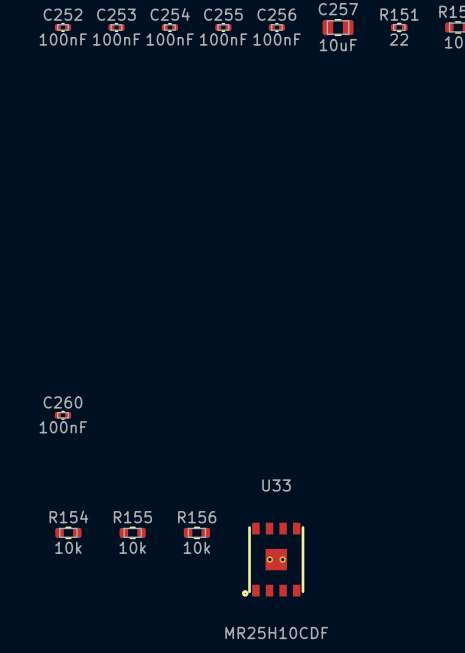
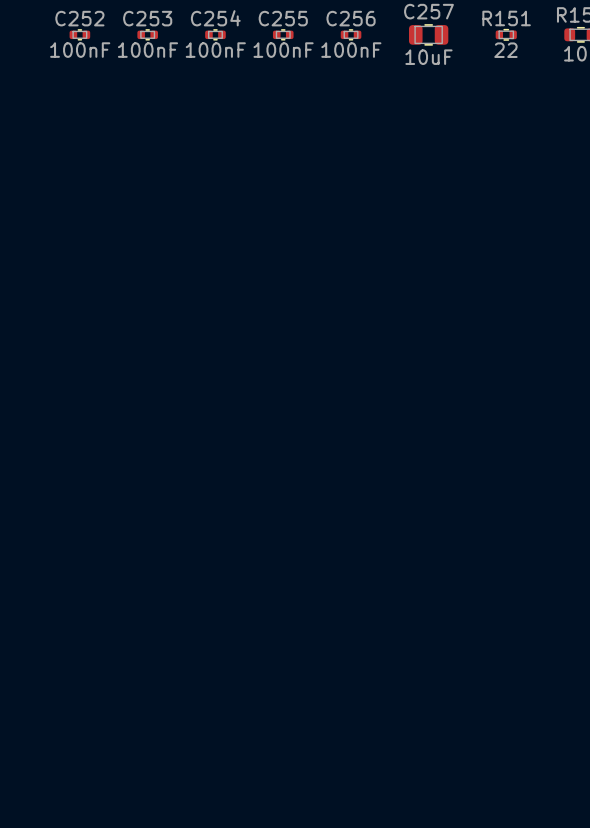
C260: 100nF (63, 415) -> none
R154: 10k (68, 532) -> none
R155: 10k (132, 532) -> none
R156: 10k (196, 532) -> none
U33: MR25H10CDF (273, 559) -> none

